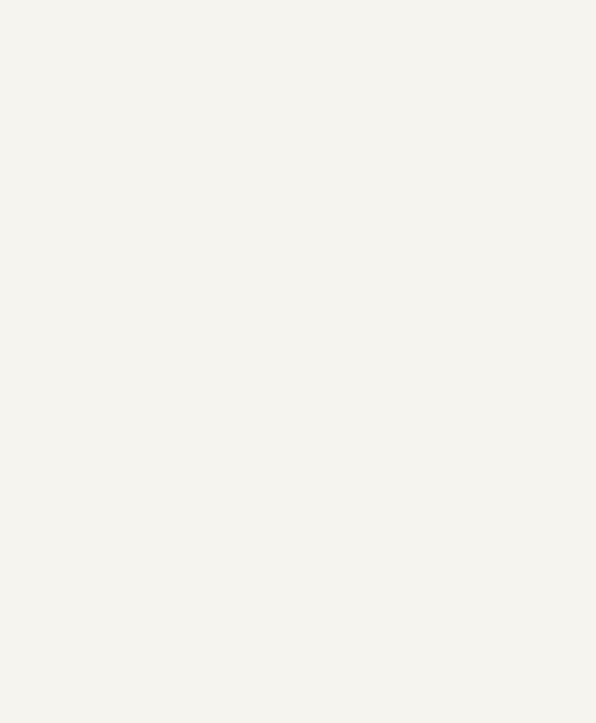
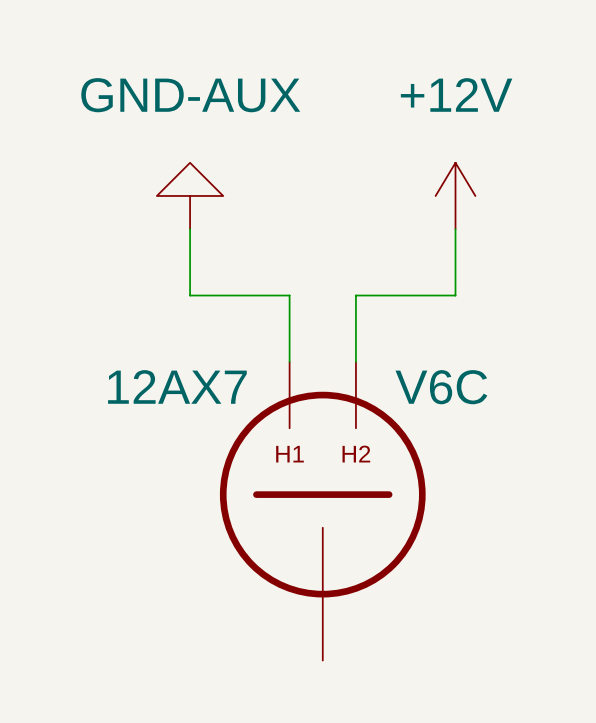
power symbol: none -> GND-AUX (190, 195)
power symbol: none -> +12V (455, 195)
wire: none -> (190, 229) (190, 295) (289, 295) (289, 361)
wire: none -> (455, 229) (455, 295) (355, 295) (355, 361)
V6C: none -> 12AX7 (322, 511)

